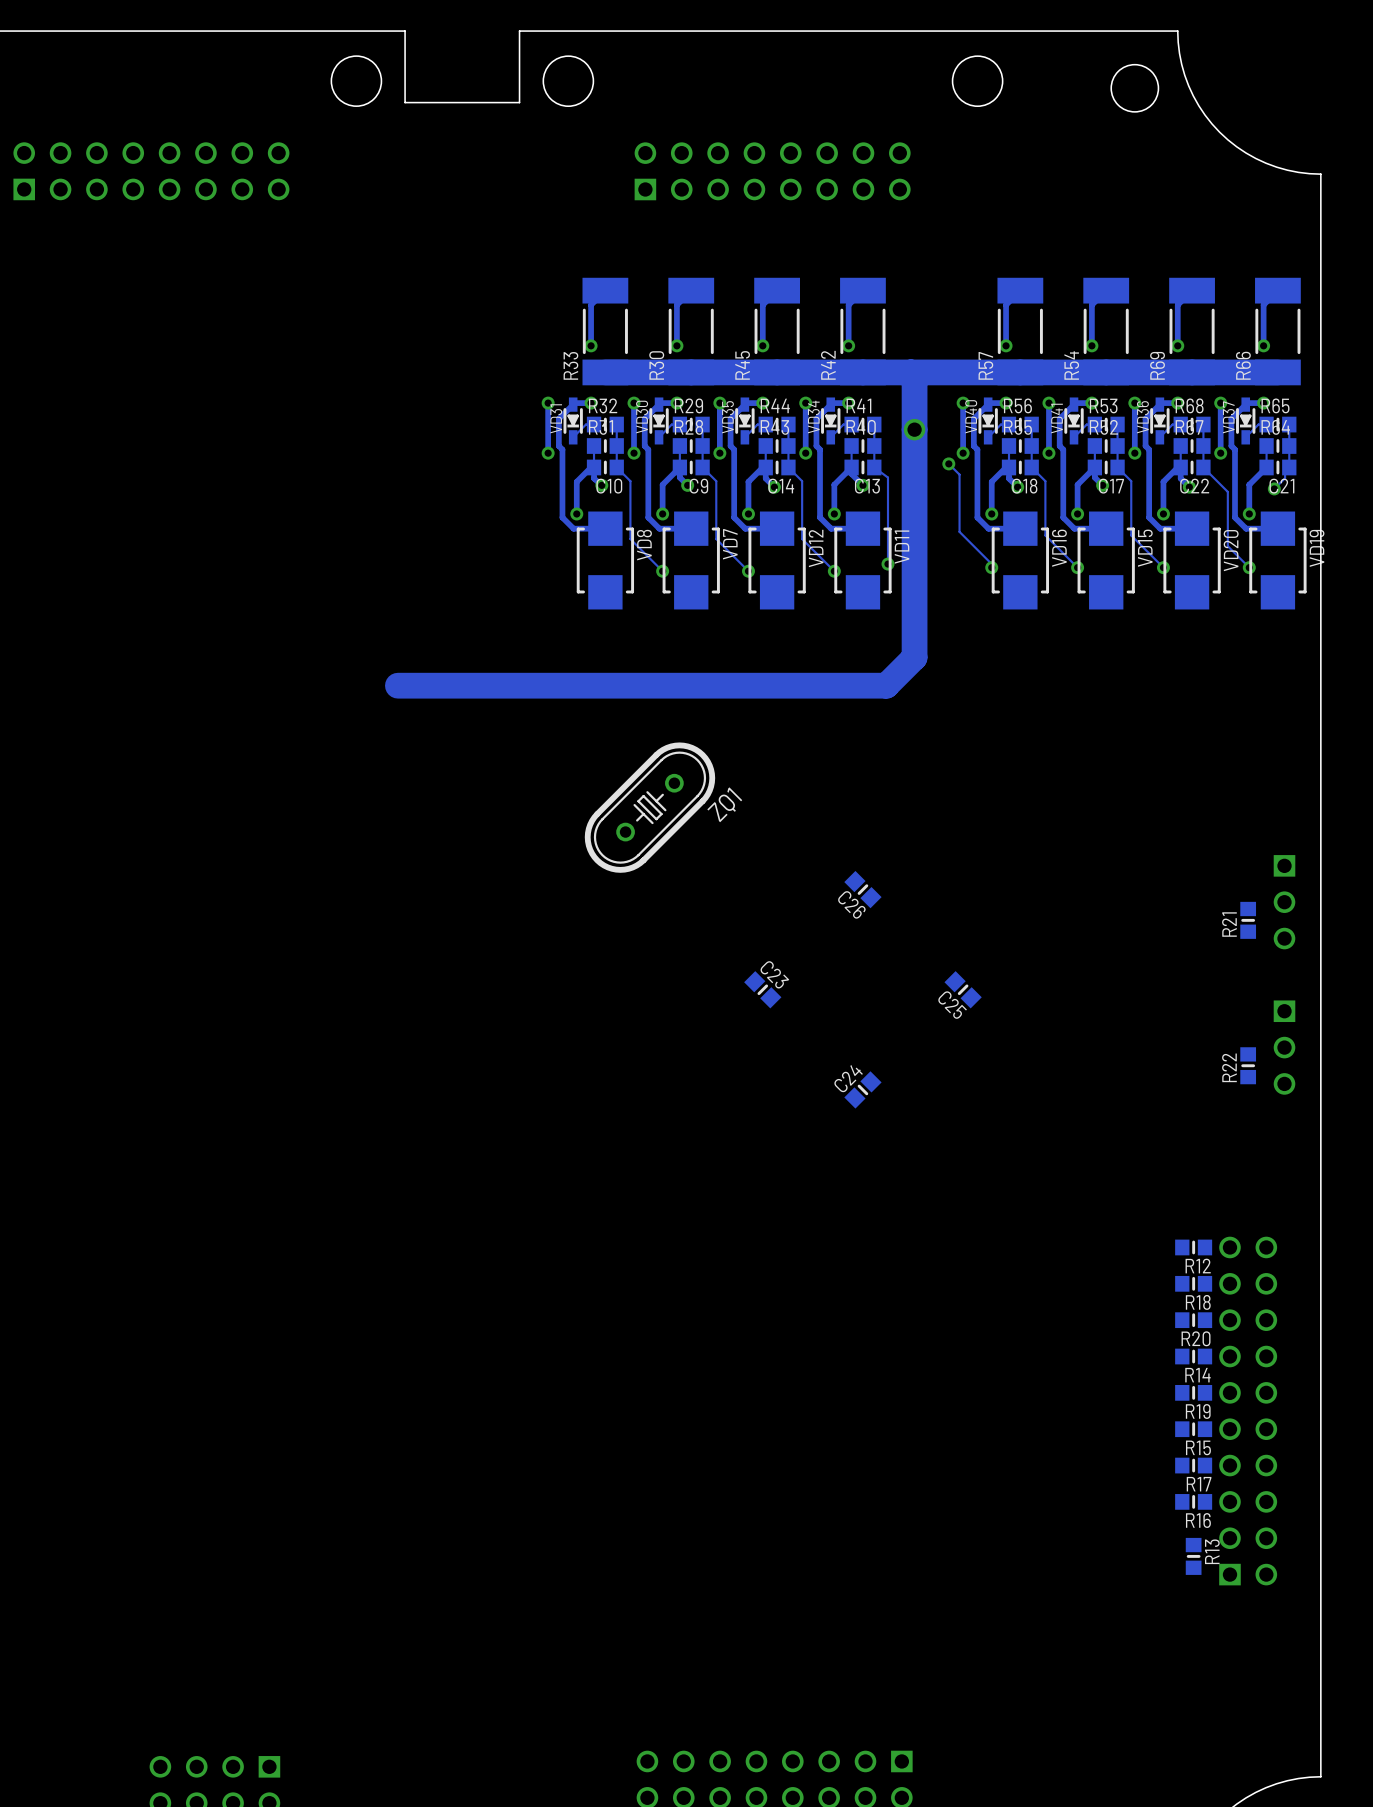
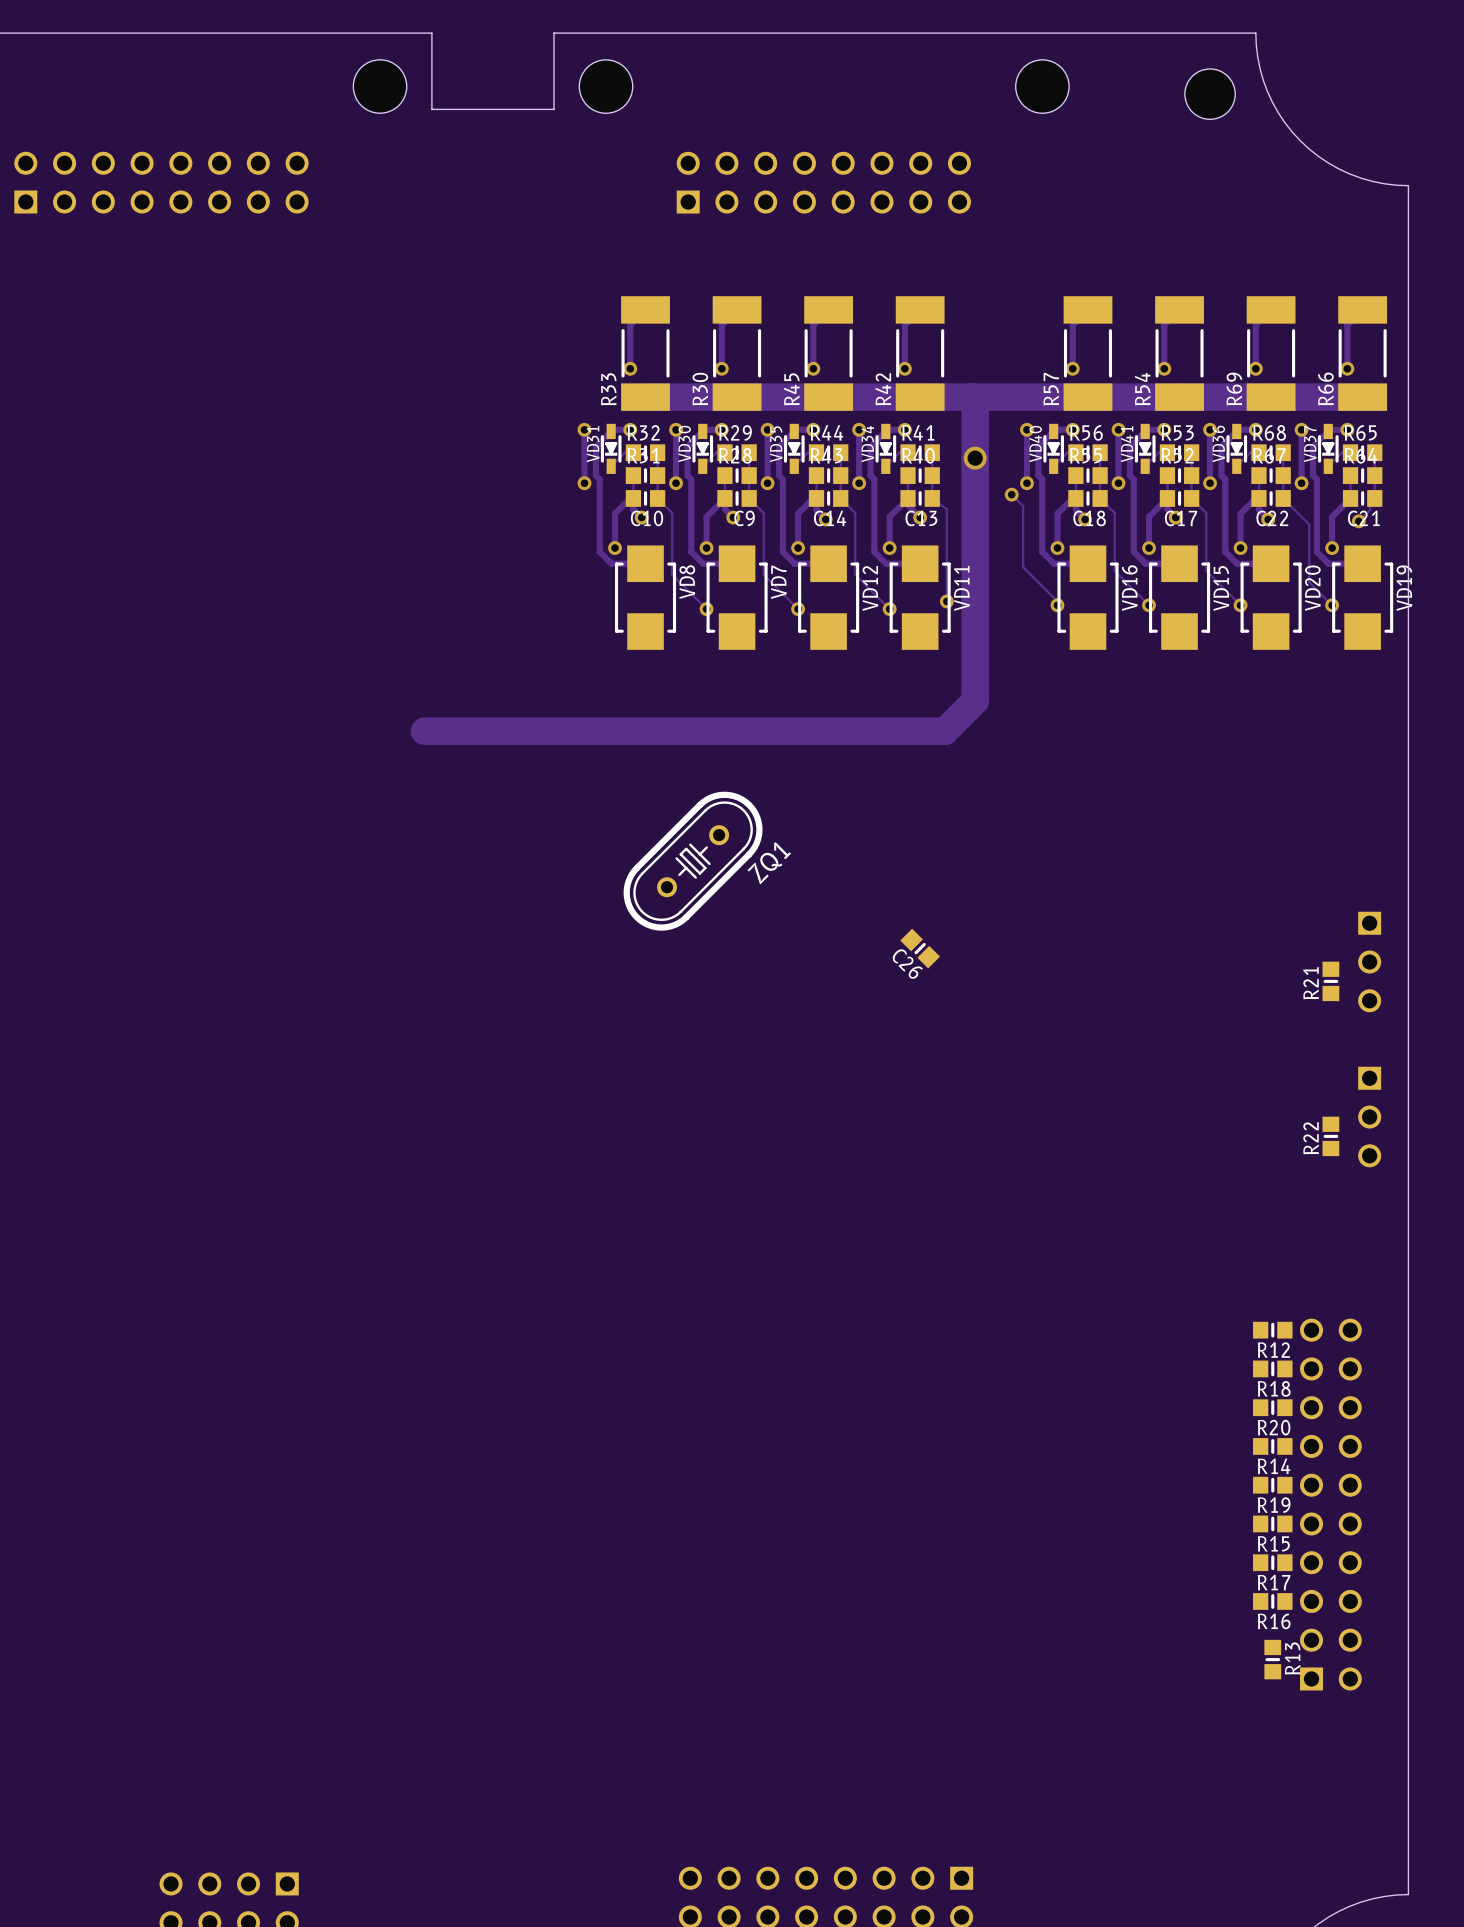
C23: (762, 989) -> none
C25: (963, 989) -> none
C24: (862, 1089) -> none

